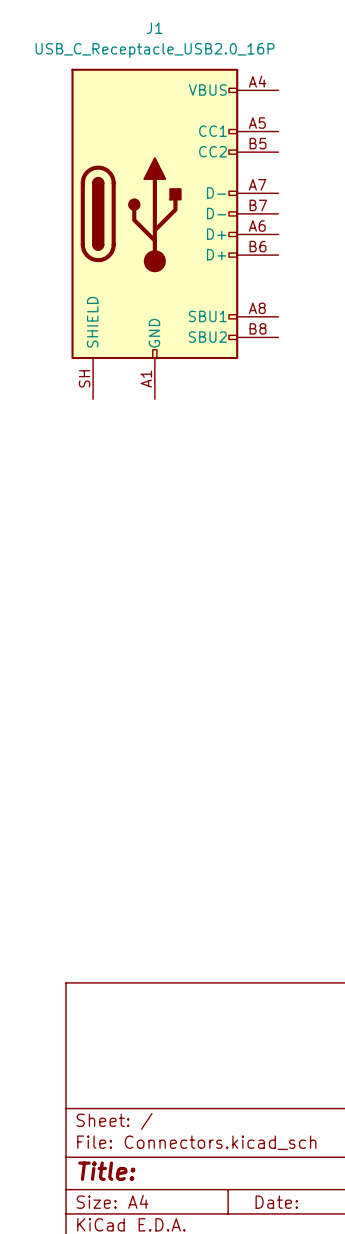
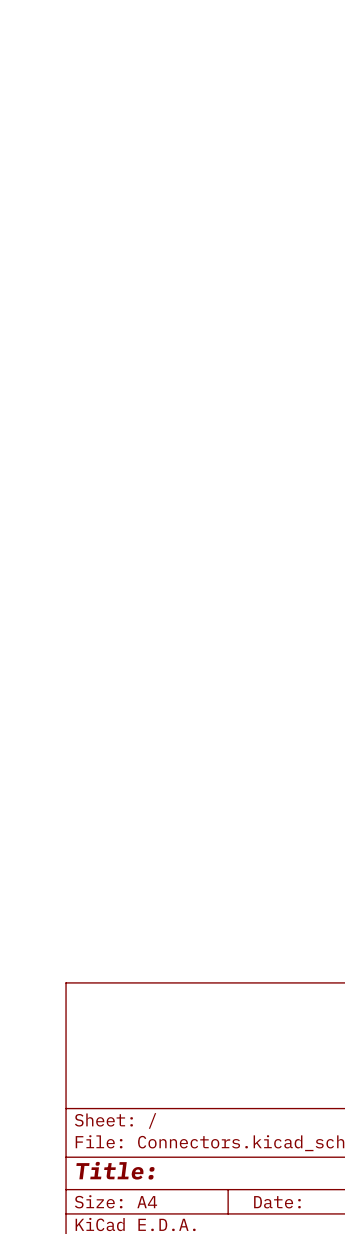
J1: USB_C_Receptacle_USB2.0_16P (174, 233) -> none

